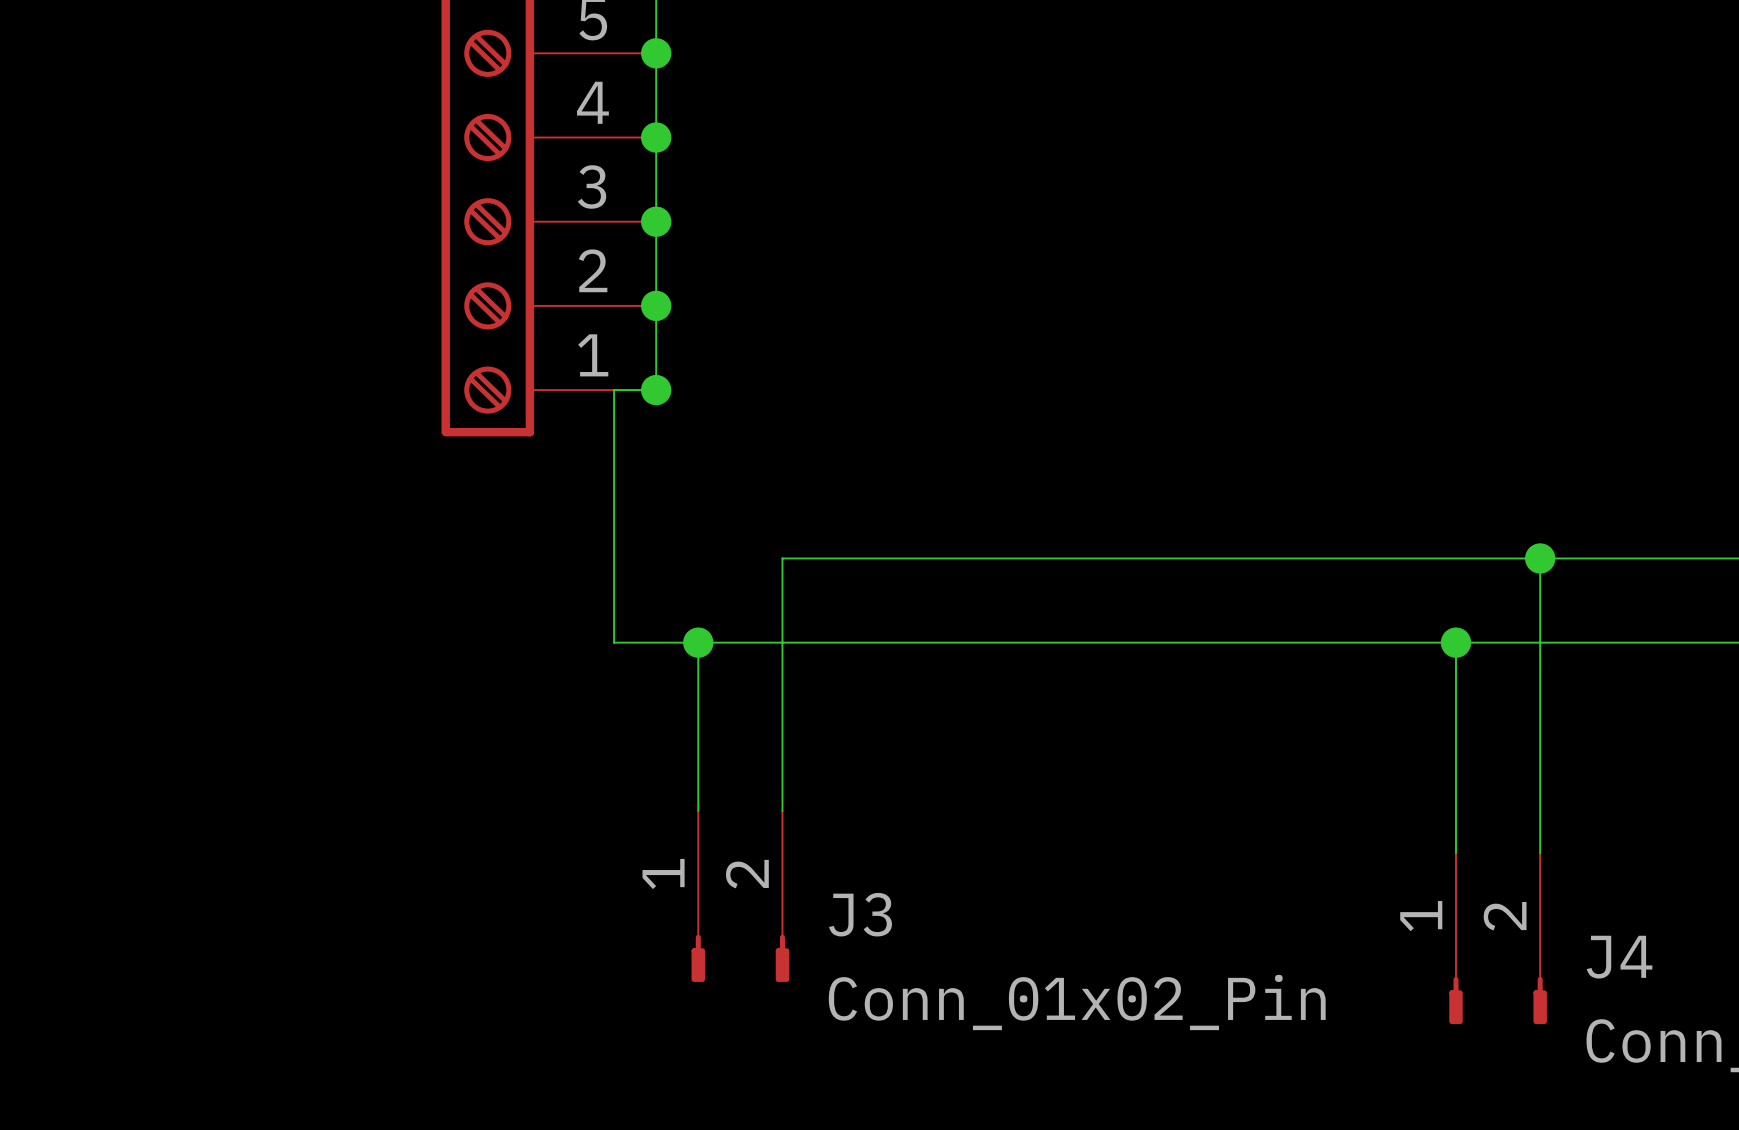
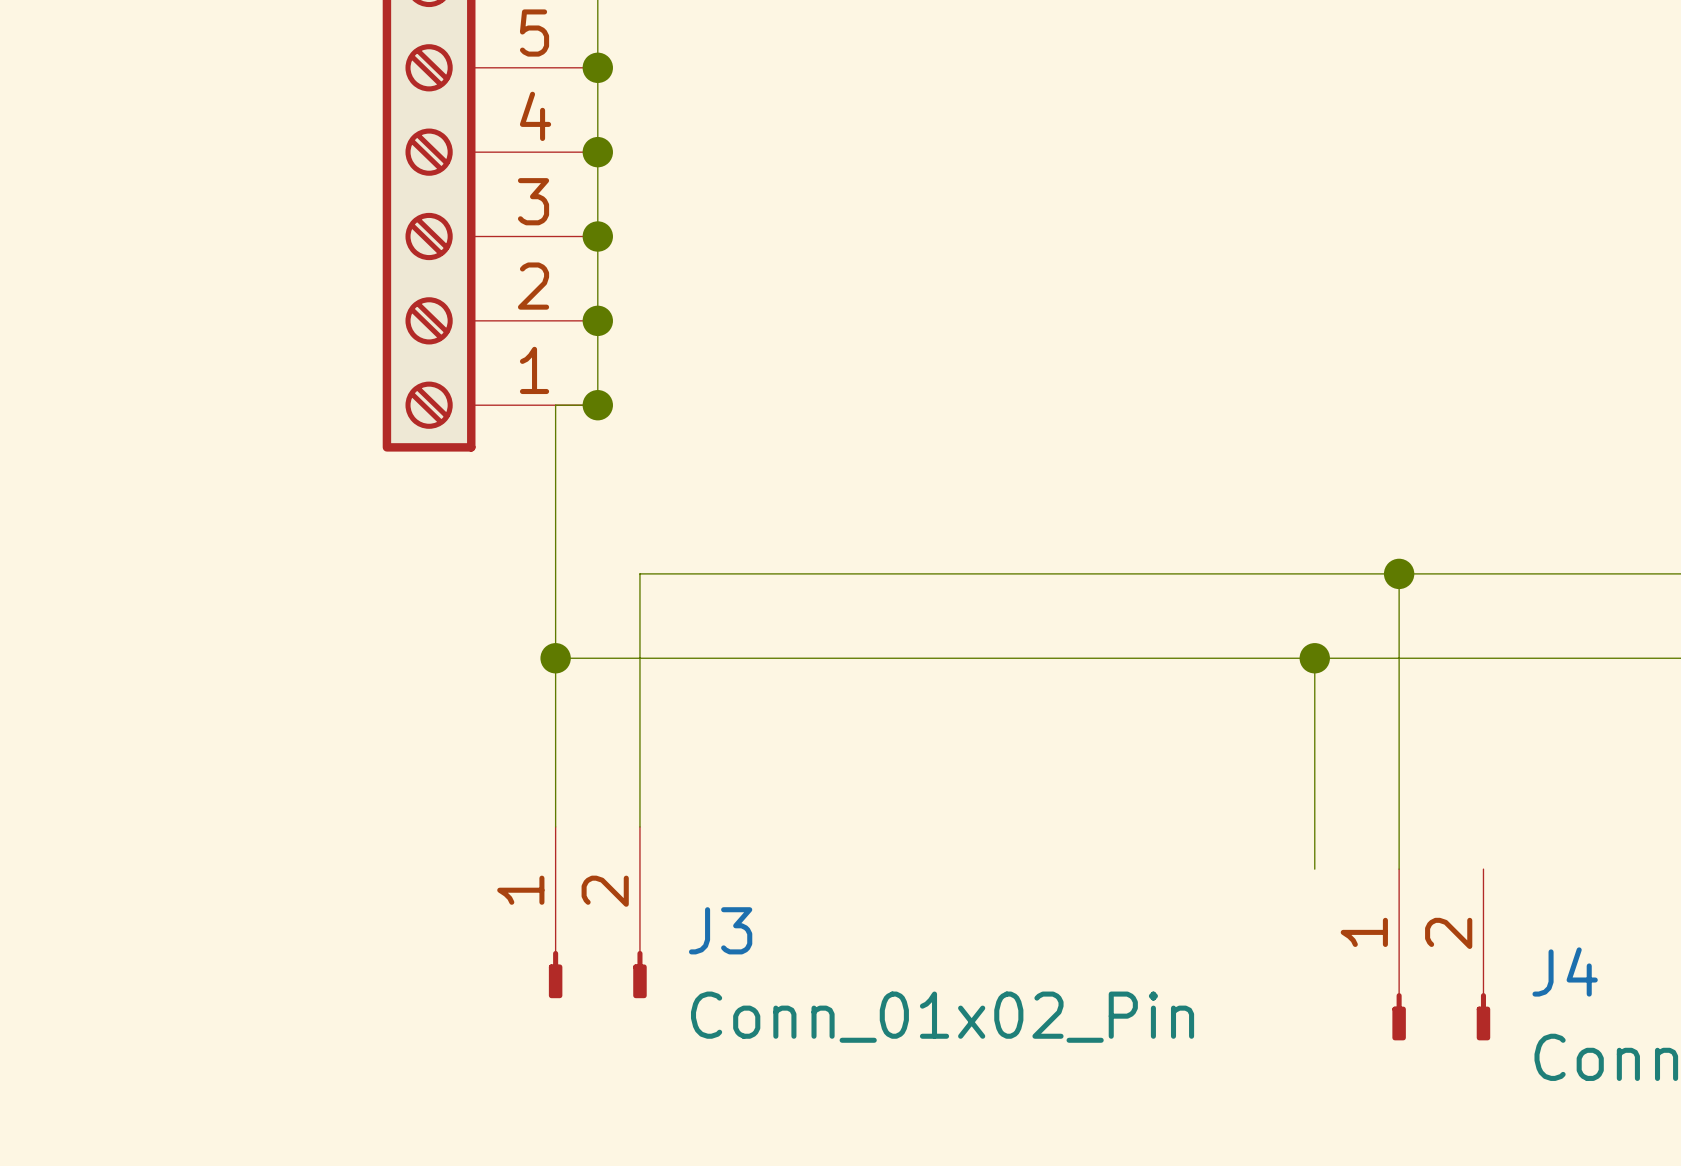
wire: (782, 558) (782, 811) -> (724, 573) (639, 573) (639, 658)
wire: none -> (1399, 573) (1399, 658)
junction: none -> (1399, 573)
wire: (1540, 558) (1540, 853) -> none
junction: (1540, 558) -> none
wire: none -> (555, 658) (555, 826)
junction position: (698, 642) -> (555, 658)
wire: none -> (1314, 658) (1314, 869)
junction: none -> (1314, 658)
junction: (1455, 642) -> none
J3 position: (740, 896) -> (597, 912)

